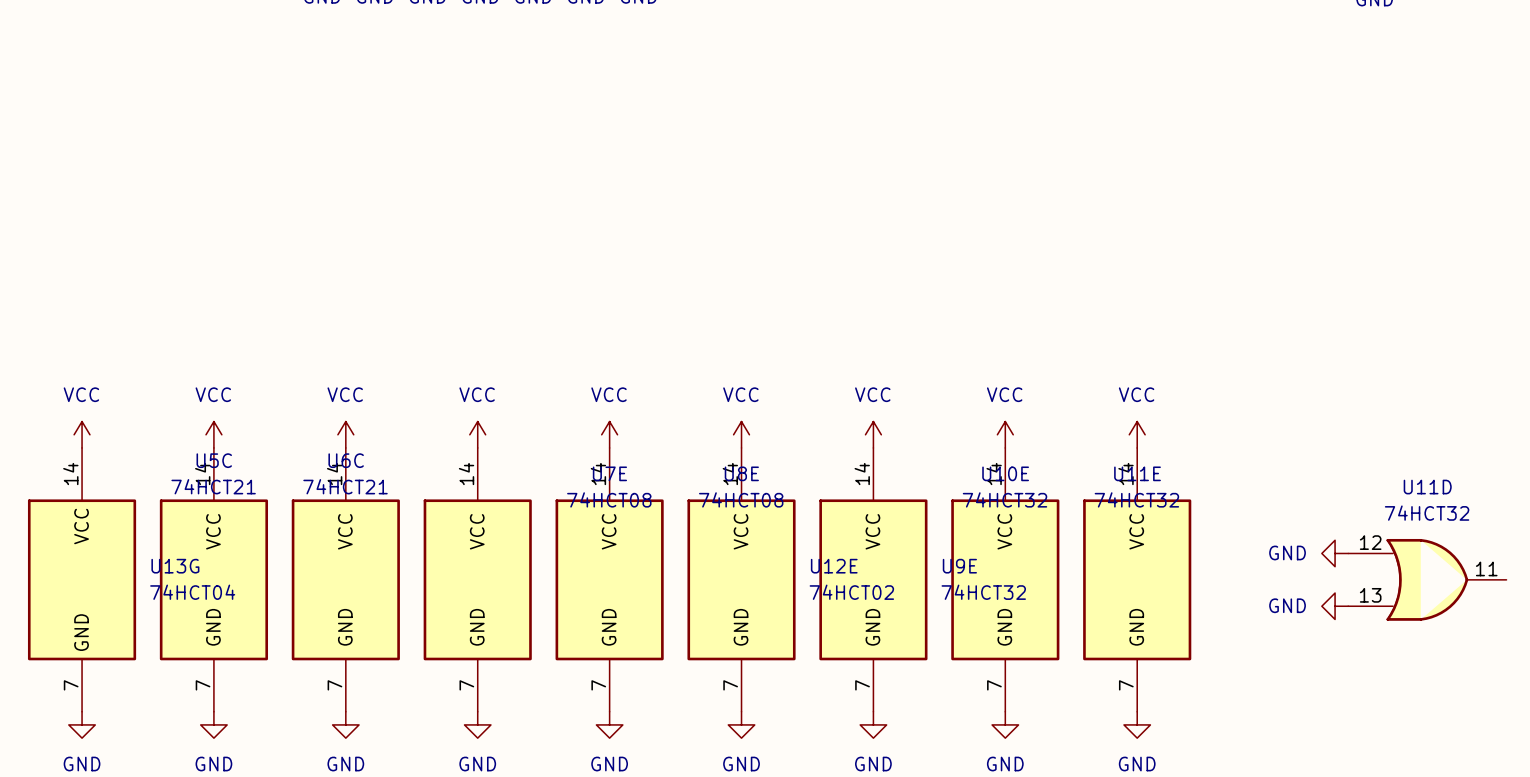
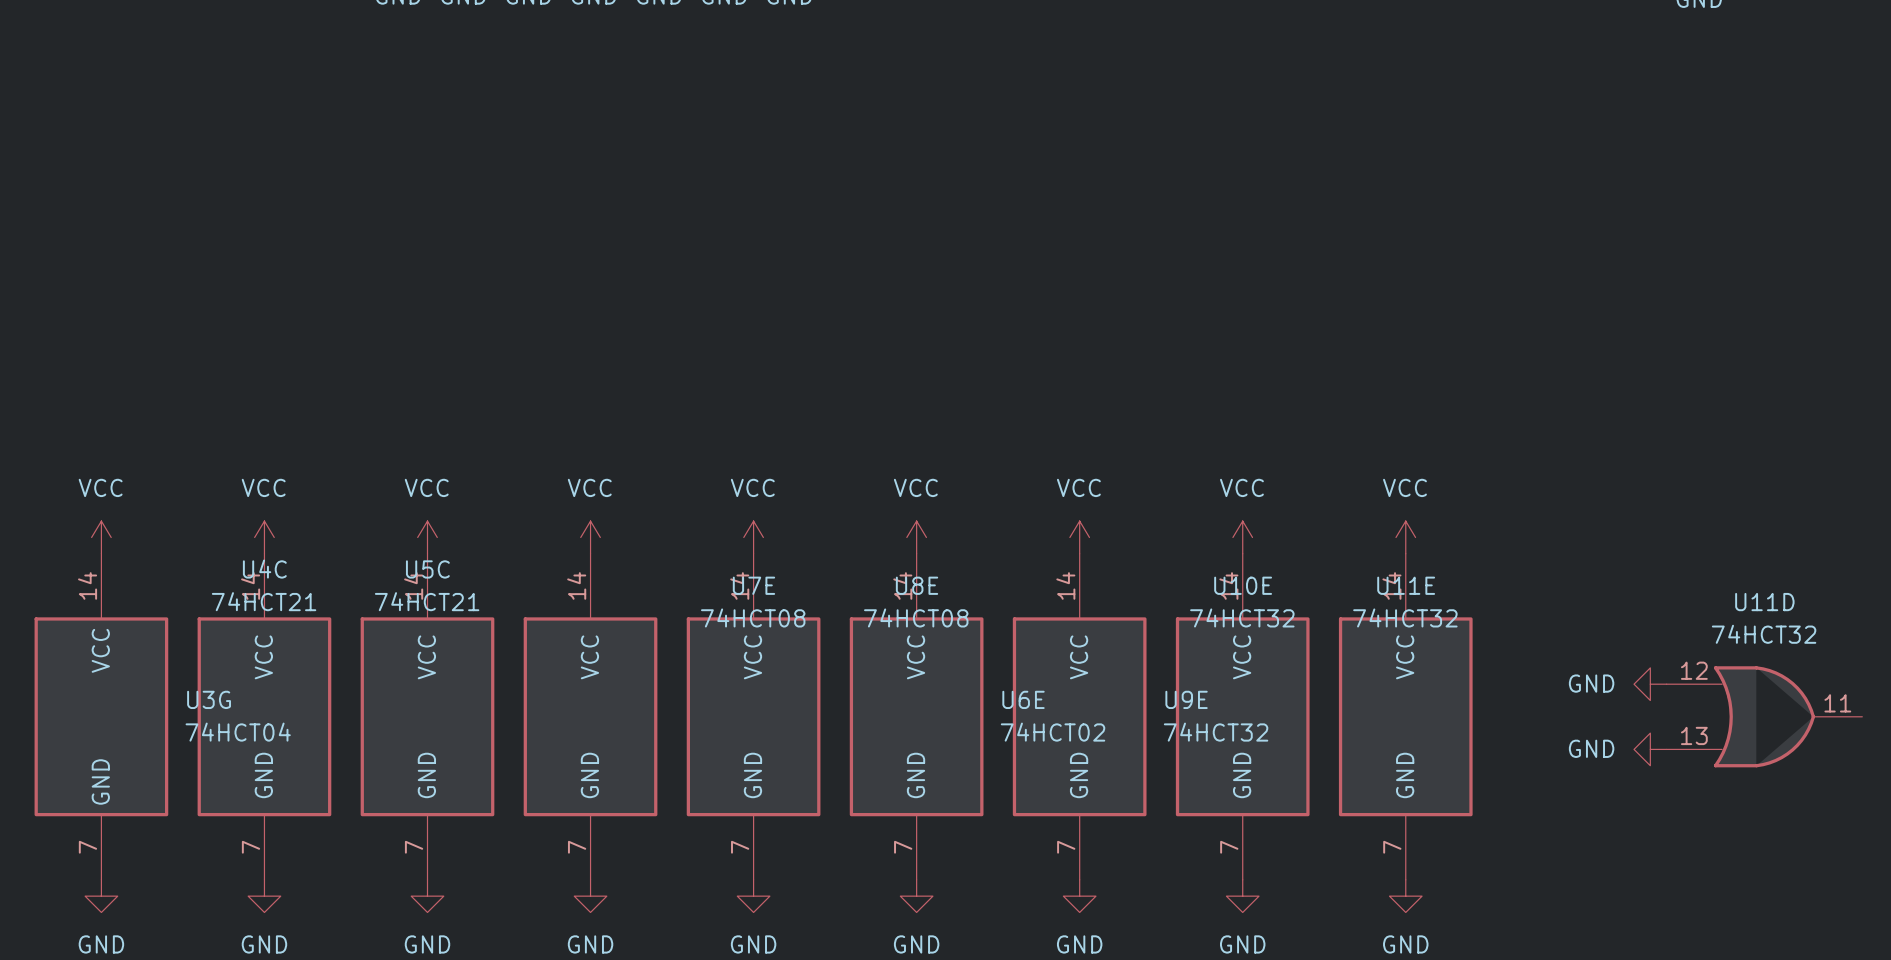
U5C name: U5C (214, 460) -> U4C (264, 569)
U6C name: U6C (346, 460) -> U5C (427, 569)
U13G name: U13G (175, 566) -> U3G (209, 699)
U12E name: U12E (834, 566) -> U6E (1023, 699)

